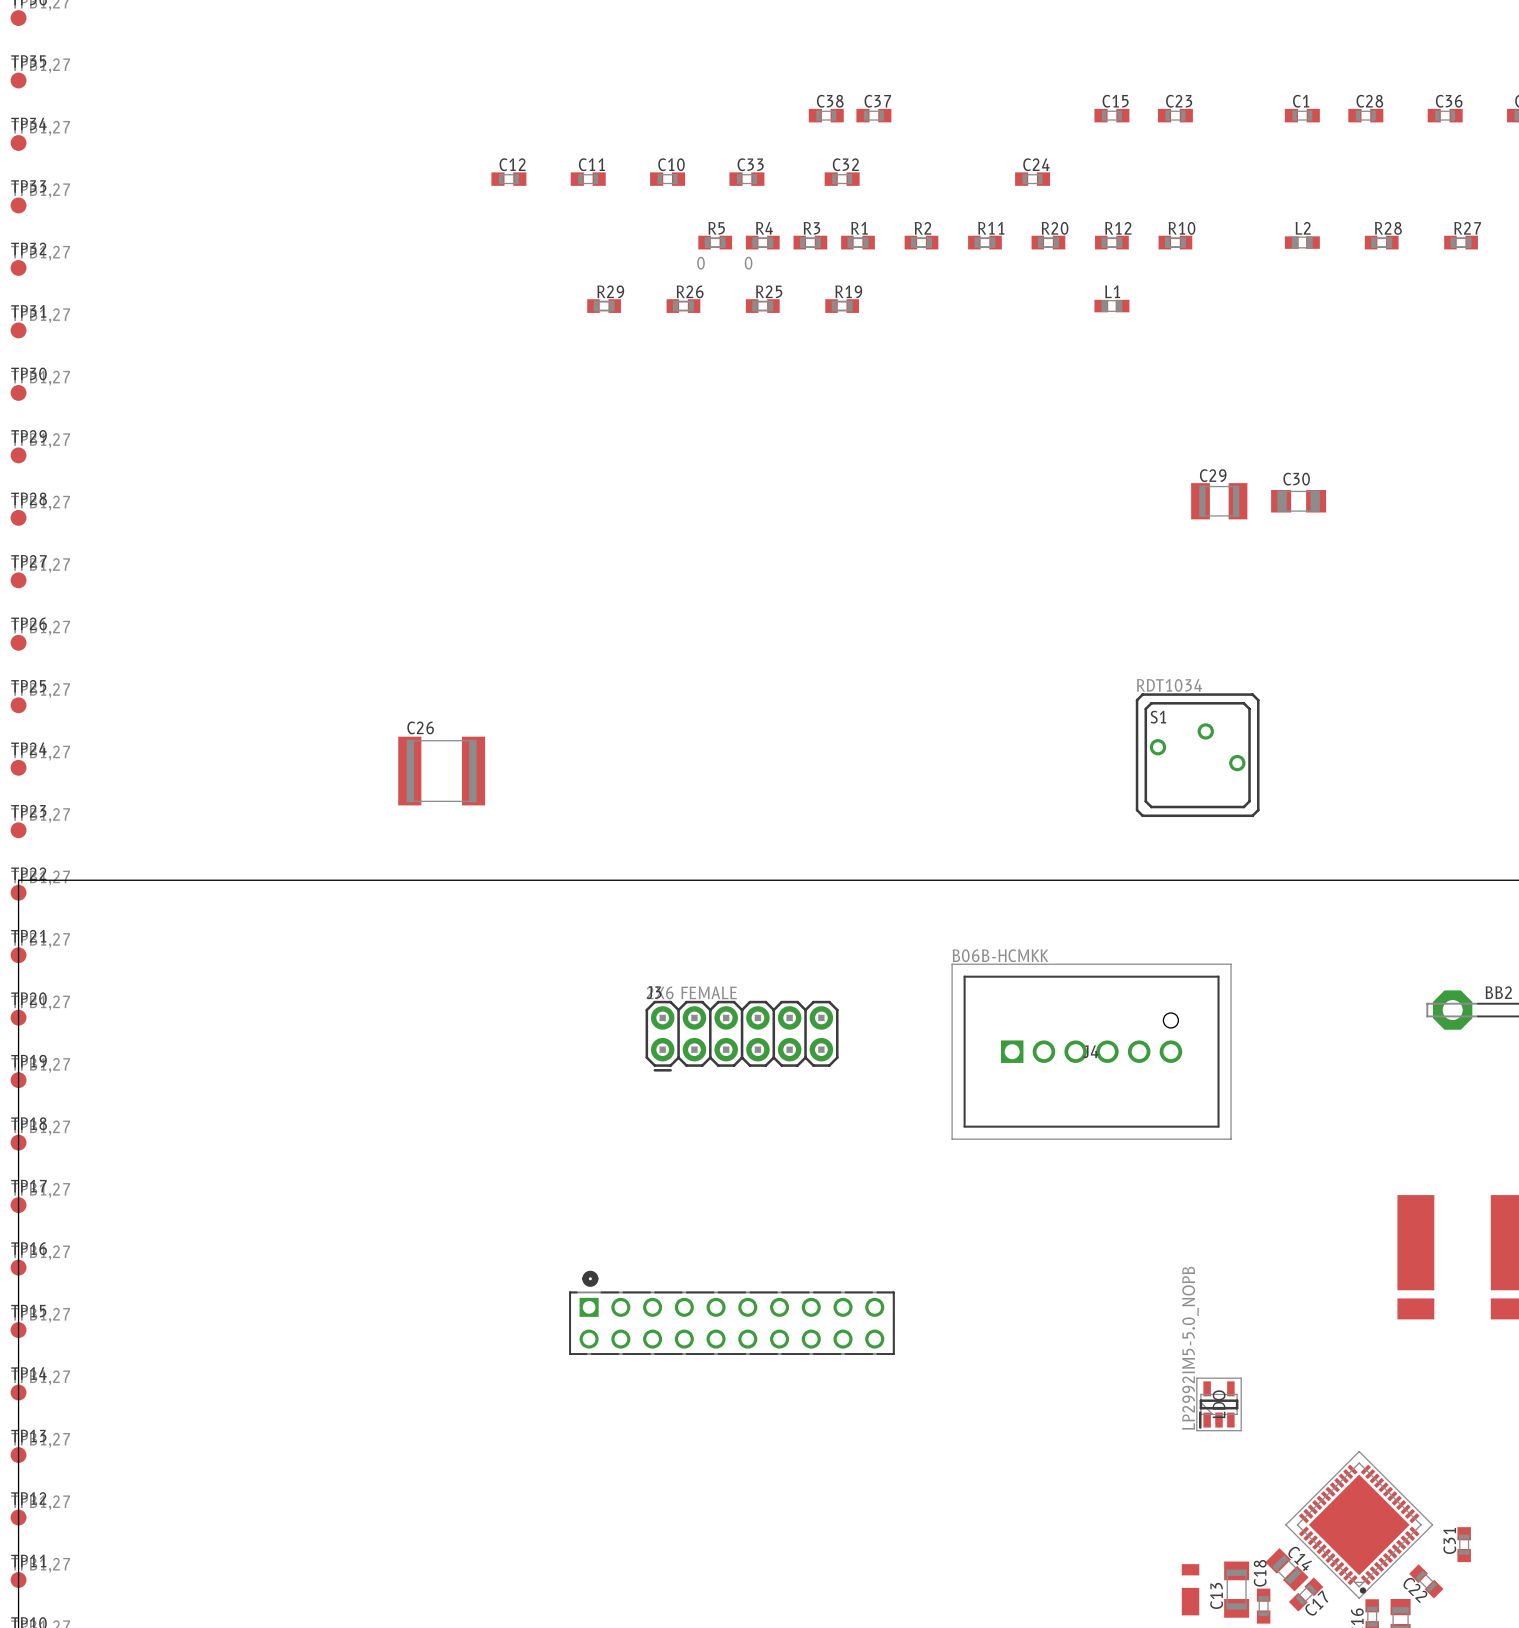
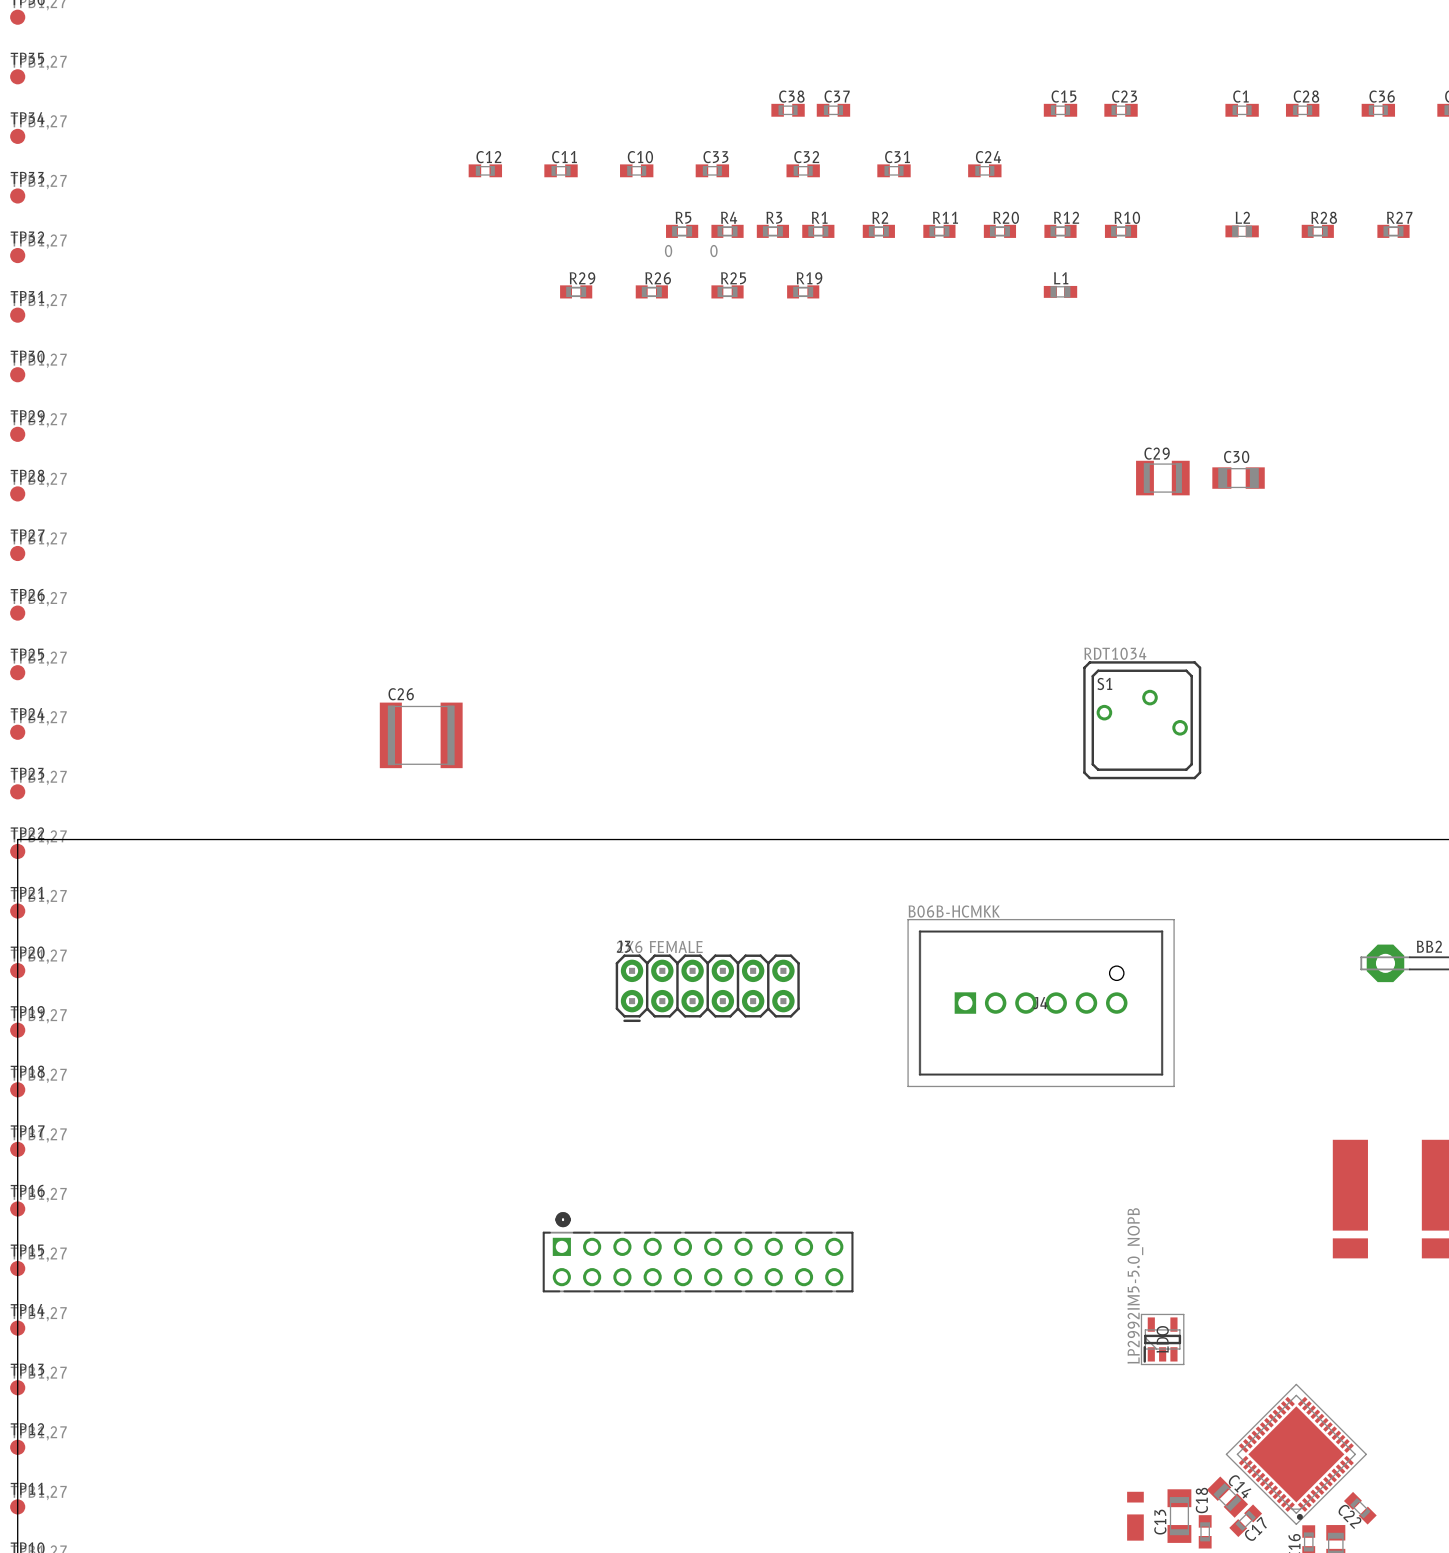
C31 rotation: 0° (1464, 1544) -> 90° clockwise (894, 170)
C31 position: (1464, 1544) -> (894, 170)

